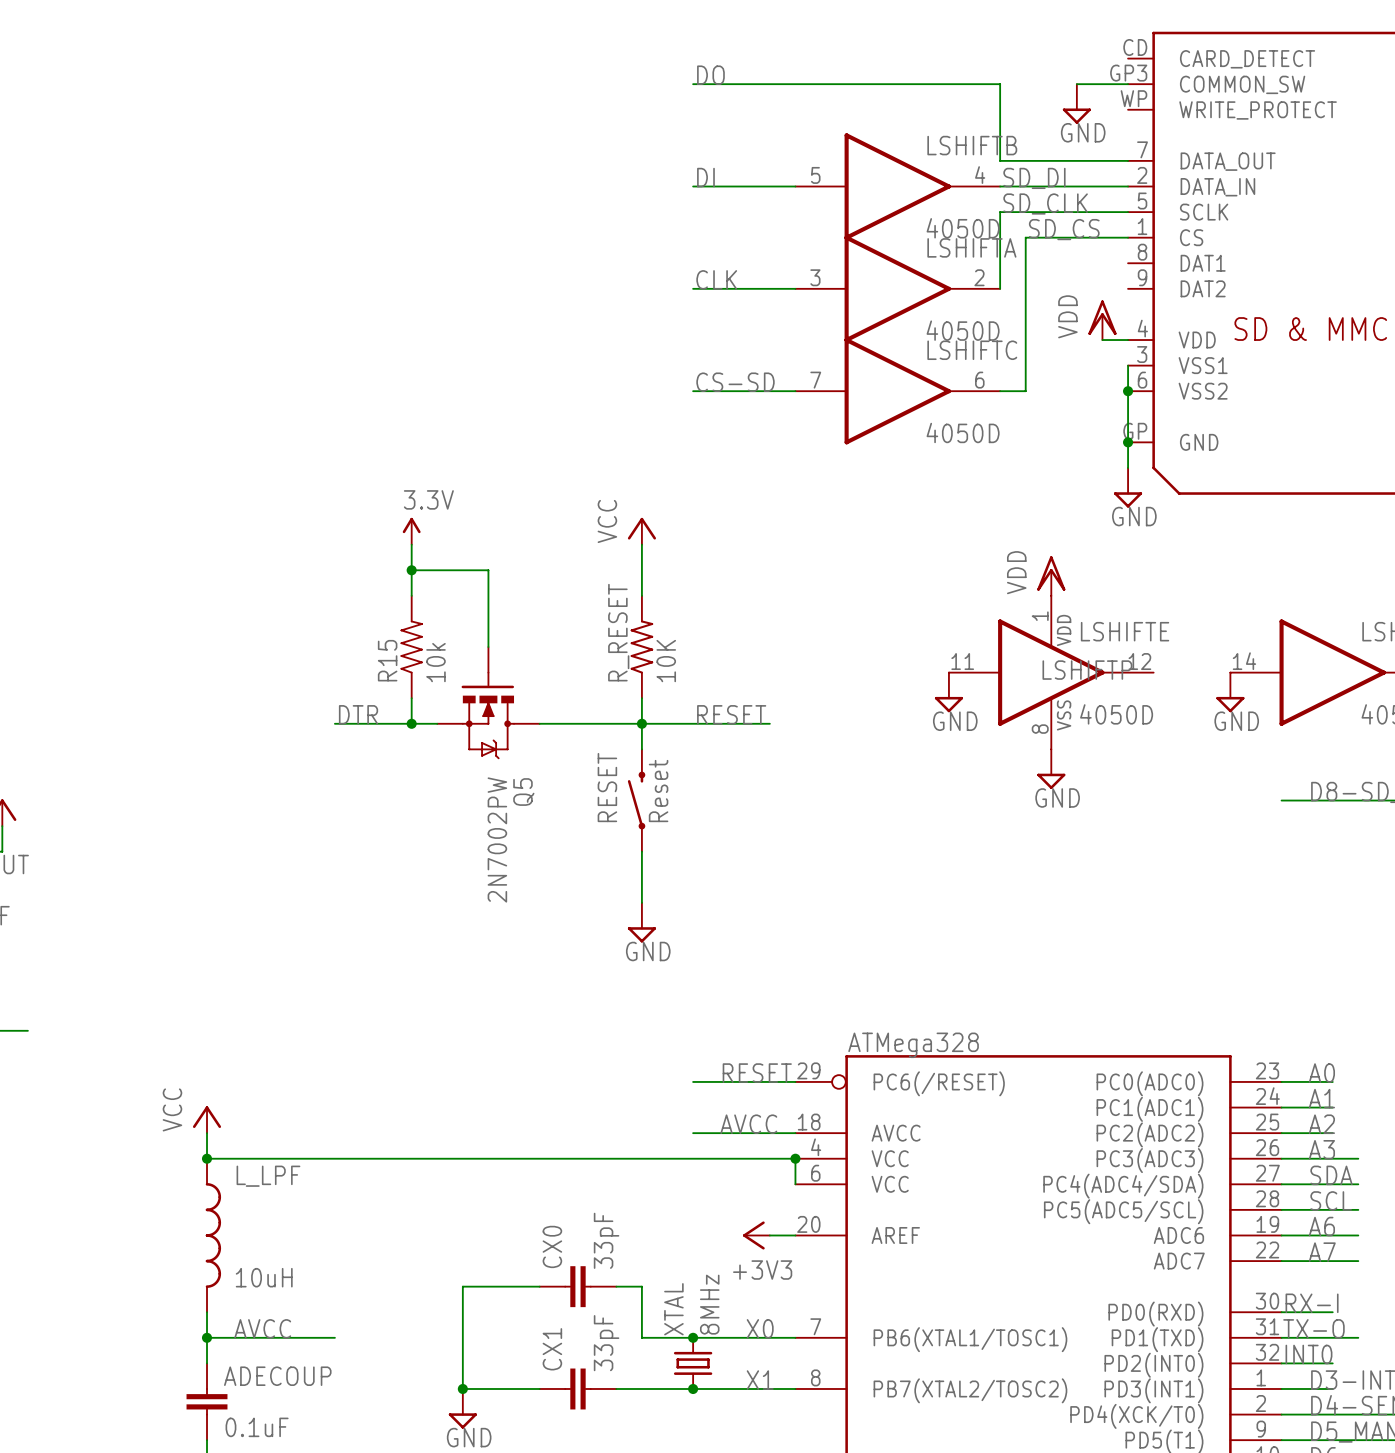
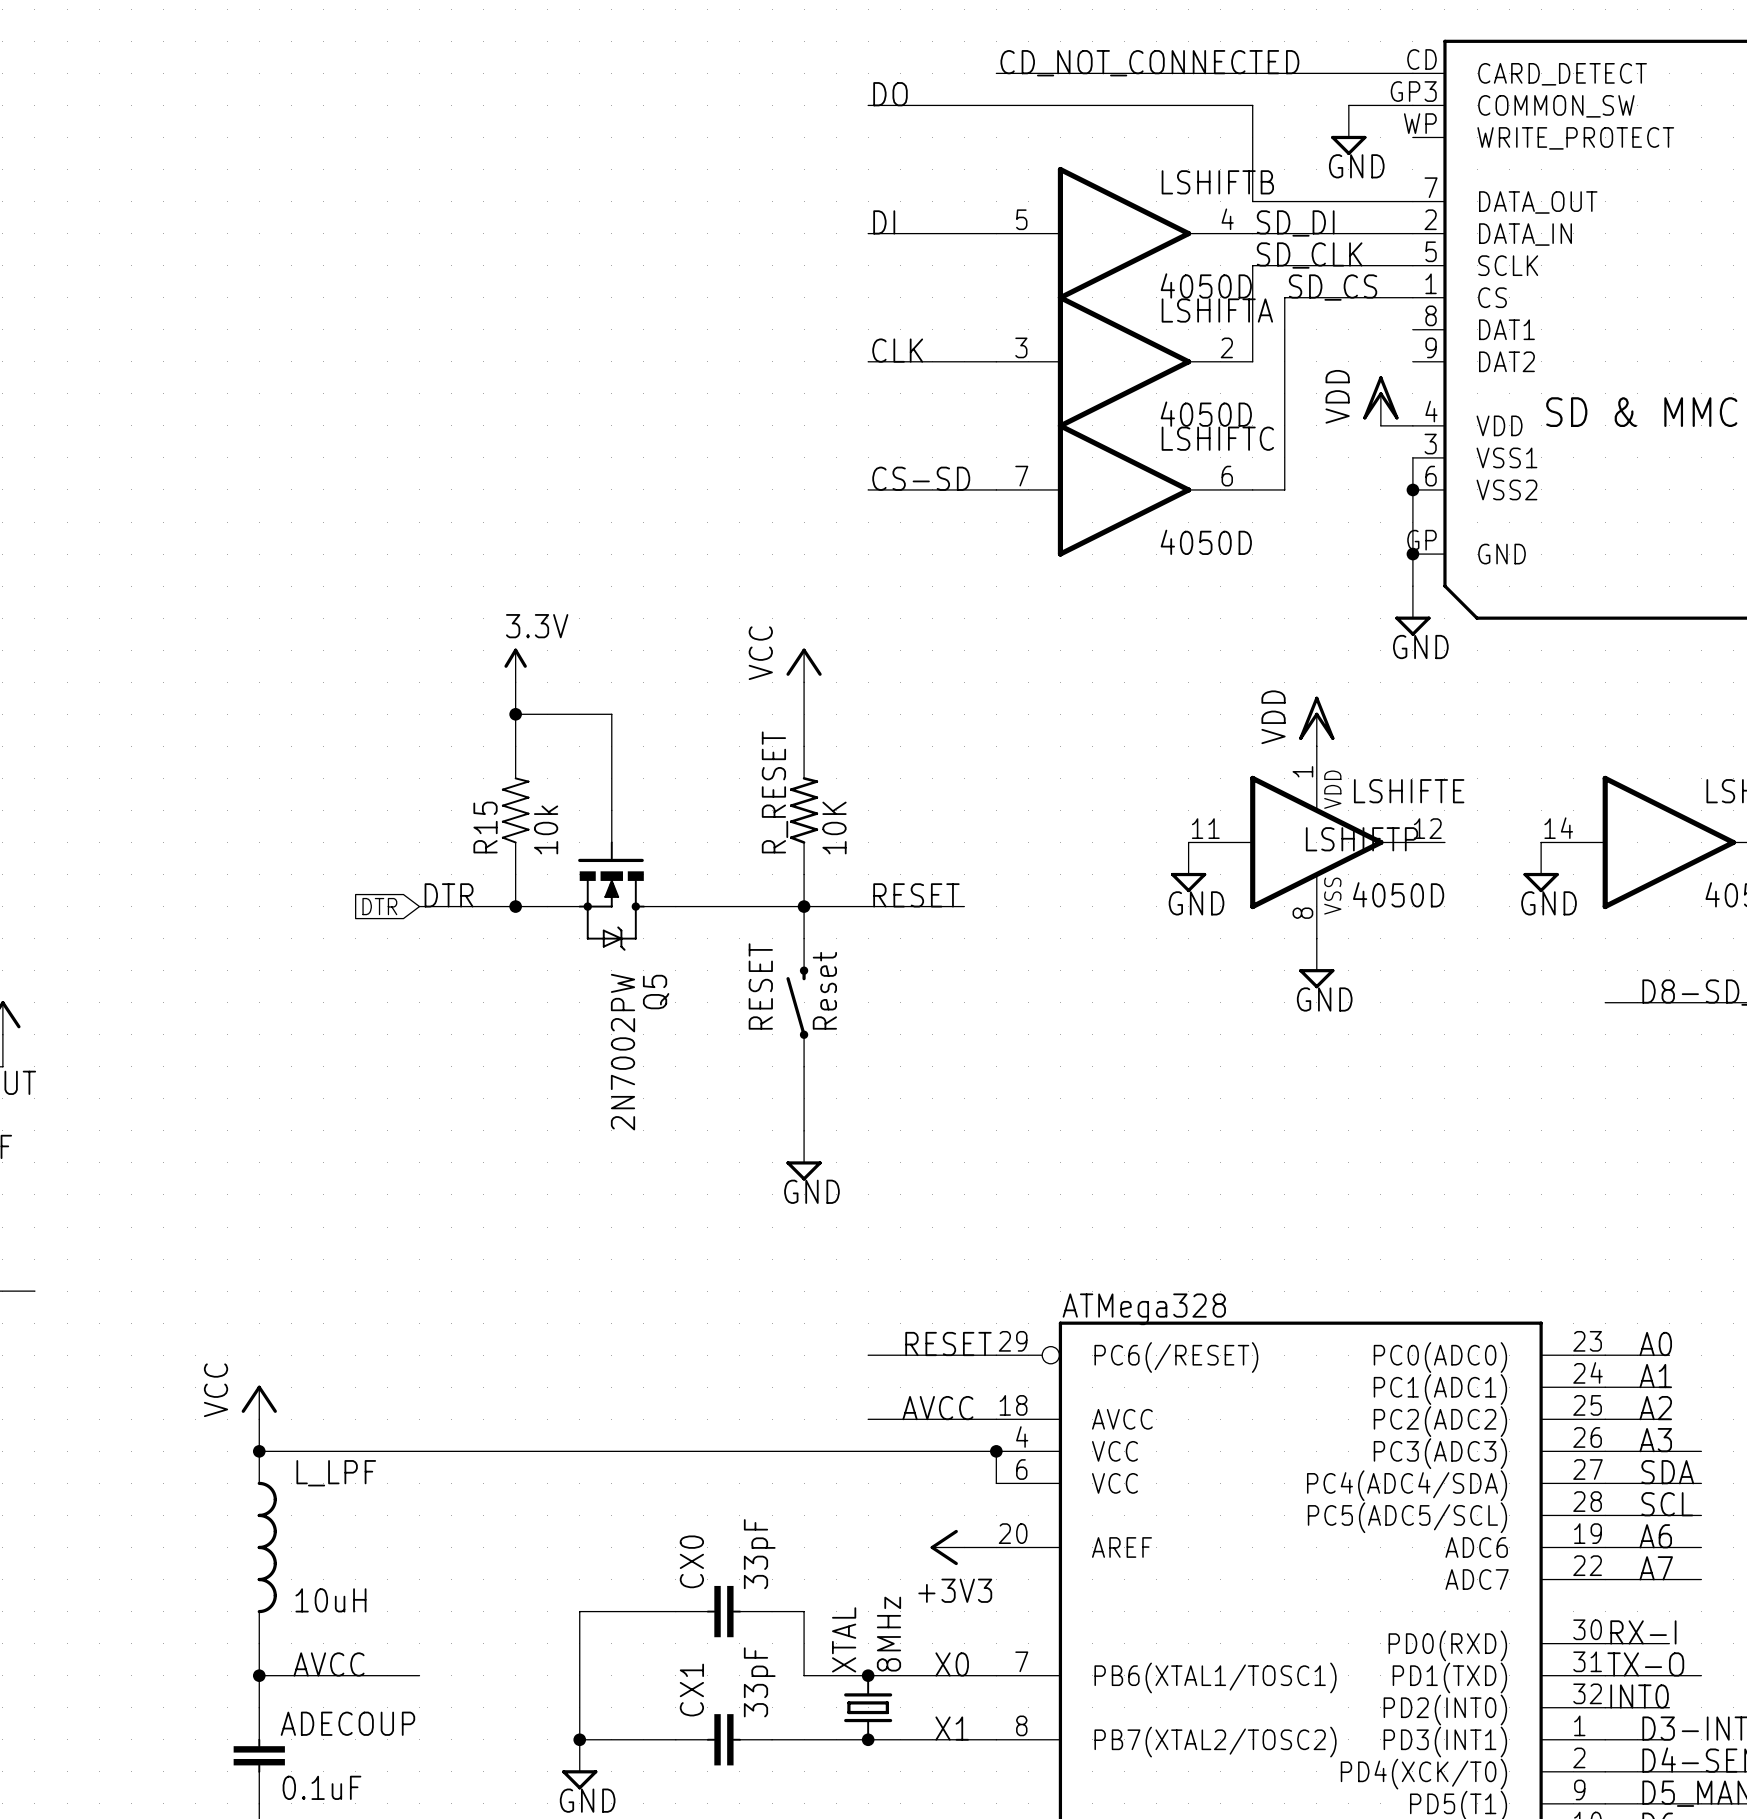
label: none -> CD_NOT_CONNECTED (1149, 63)
wire: none -> (996, 73) (1412, 73)
global label: none -> DTR (379, 906)

